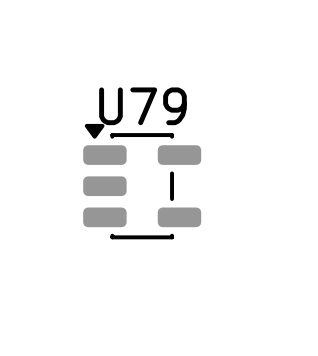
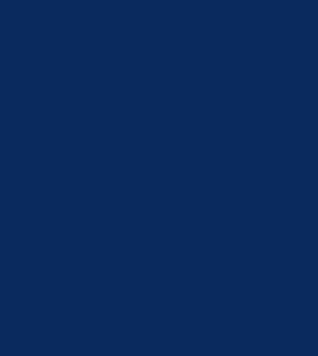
U79: (142, 181) -> none

